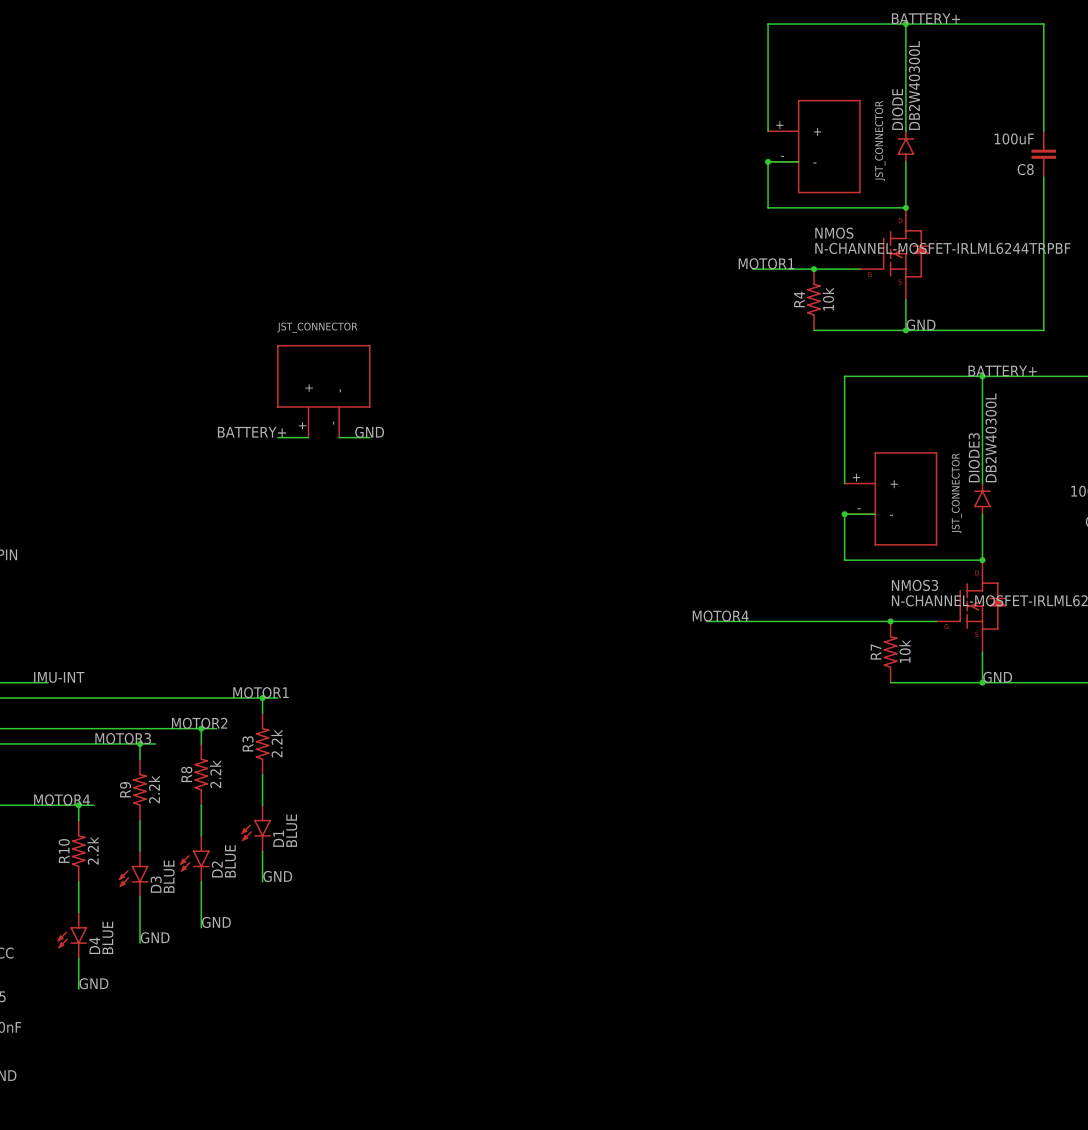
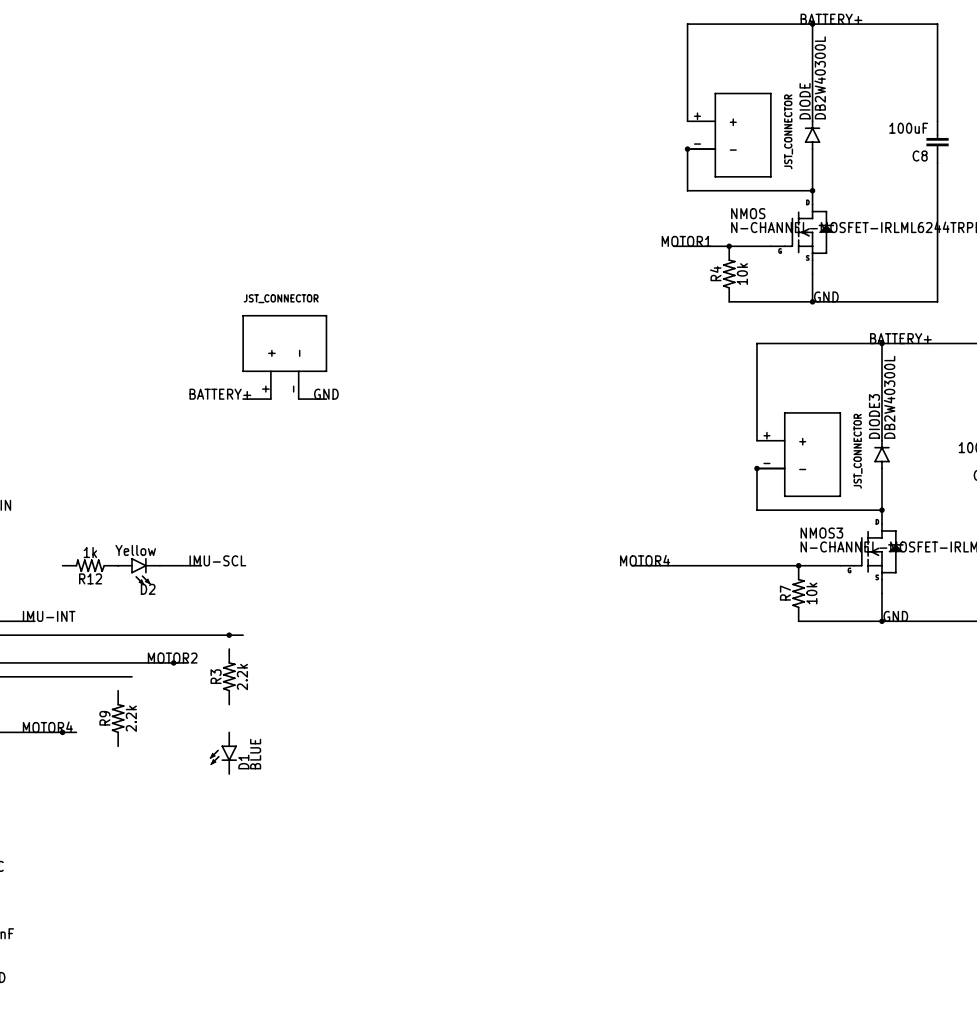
label: none -> IMU-SCL (217, 560)
R12: none -> 1k (90, 565)
wire: none -> (159, 565) (201, 565)
label: MOTOR1 (260, 692) -> none
wire: (262, 698) (262, 713) -> none
wire: (201, 728) (201, 743) -> none
label: MOTOR3 (123, 738) -> none
wire: (140, 743) (140, 759) -> none
junction: (140, 743) -> none
R8: 2.2k (201, 774) -> none
wire: (262, 774) (262, 805) -> none
wire: (78, 805) (78, 820) -> none
wire: (201, 805) (201, 835) -> none
wire: (140, 820) (140, 851) -> none
D2 symbol: [180, 835, 210, 882] -> [118, 558, 160, 585]
R10: 2.2k (78, 851) -> none
wire: (262, 851) (262, 881) -> none
D2 value: BLUE (230, 861) -> Yellow (135, 550)
D2 name position: D2 (217, 869) -> D2 (148, 589)
D3: BLUE (133, 874) -> none
label: GND (277, 876) -> none
wire: (78, 881) (78, 912) -> none
wire: (201, 881) (201, 927) -> none
wire: (140, 897) (140, 943) -> none
label: GND (216, 922) -> none
D4: BLUE (72, 935) -> none
label: GND (155, 937) -> none
wire: (78, 958) (78, 989) -> none
label: GND (93, 983) -> none

